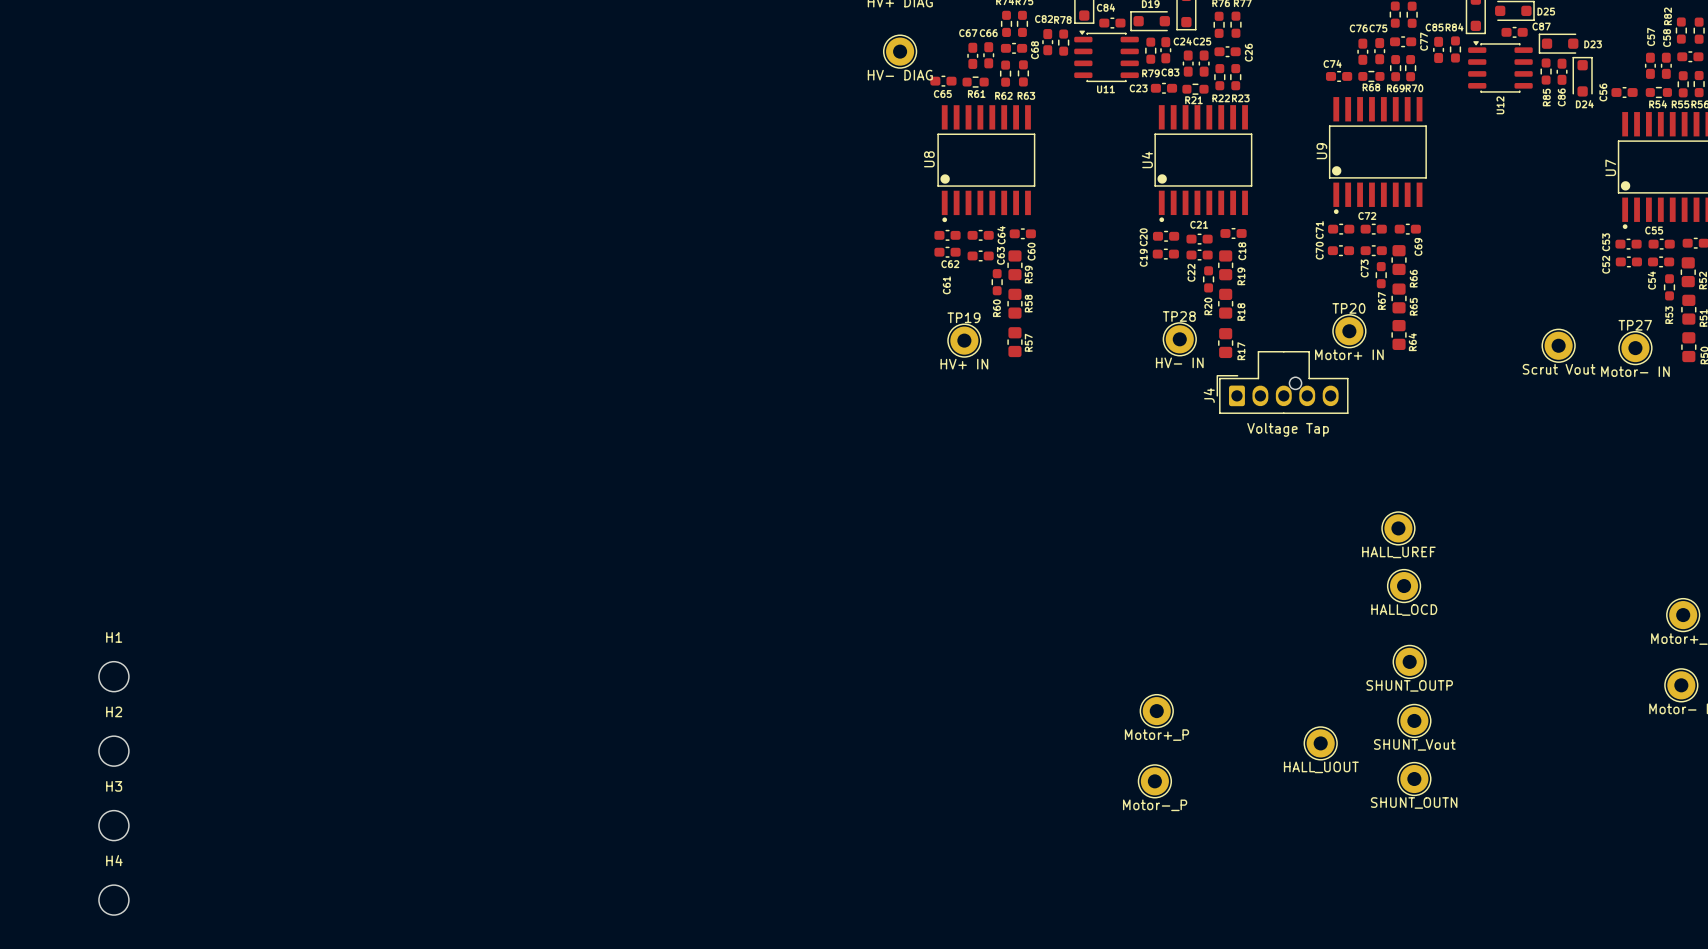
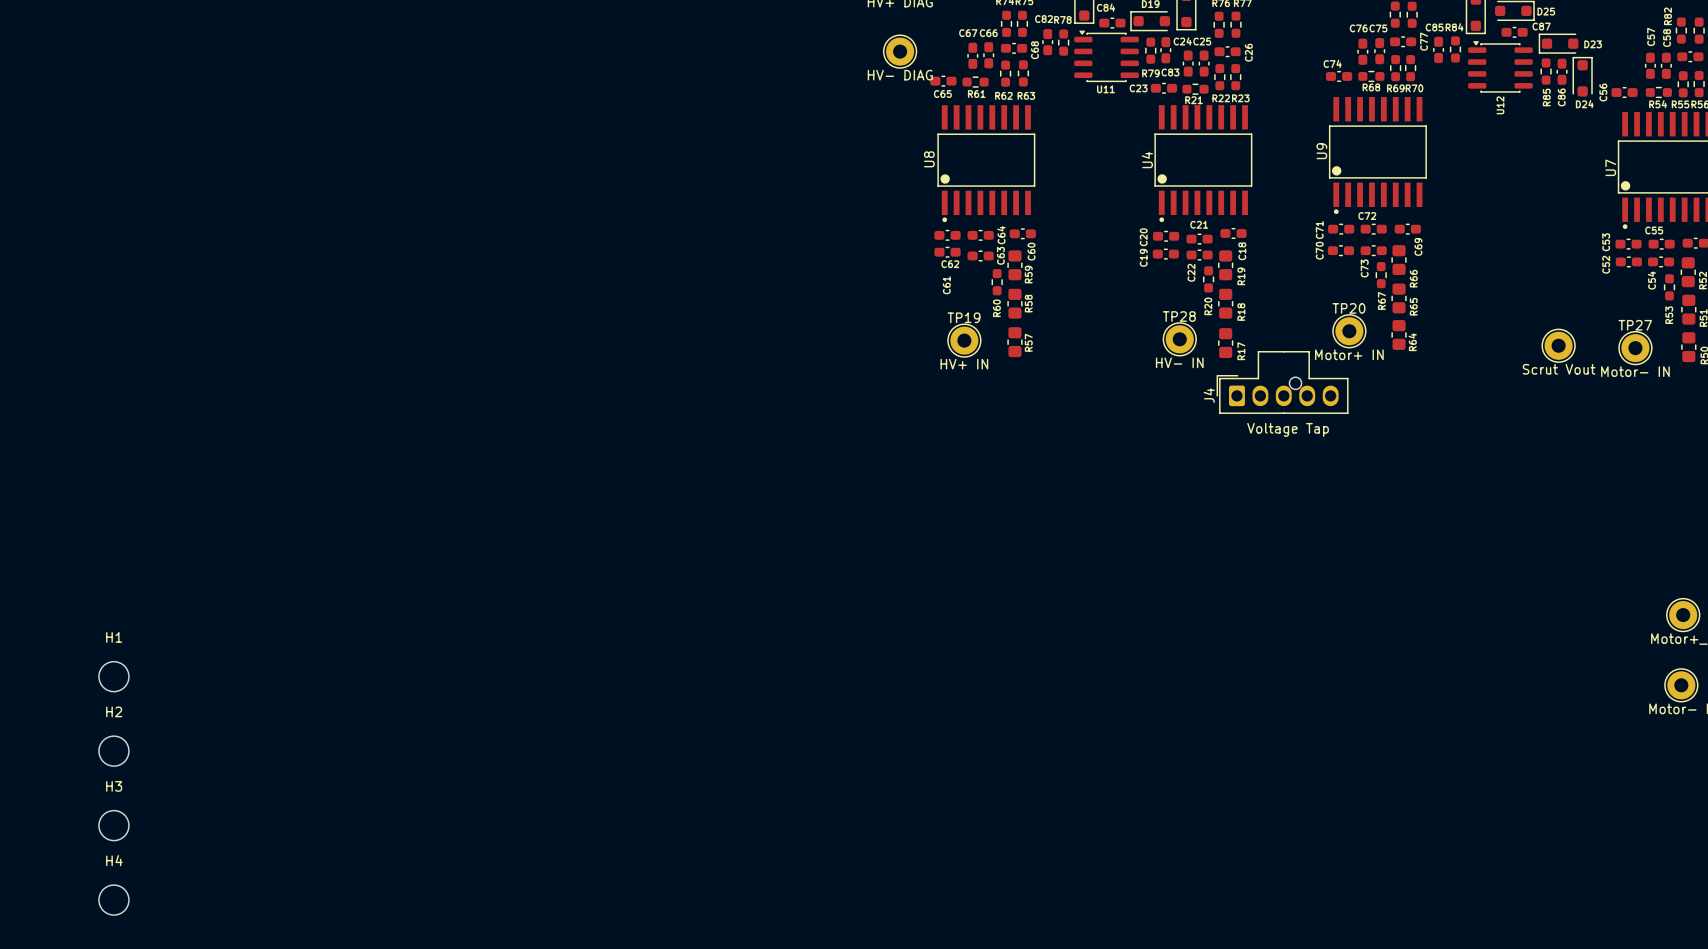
part: HALL_UREF (1398, 528) -> none
part: HALL_OCD (1404, 586) -> none
part: SHUNT_OUTP (1409, 661) -> none
part: Motor+_P (1156, 711) -> none
part: SHUNT_Vout (1414, 720) -> none
part: HALL_UOUT (1320, 743) -> none
part: SHUNT_OUTN (1414, 779) -> none
part: Motor-_P (1154, 781) -> none

